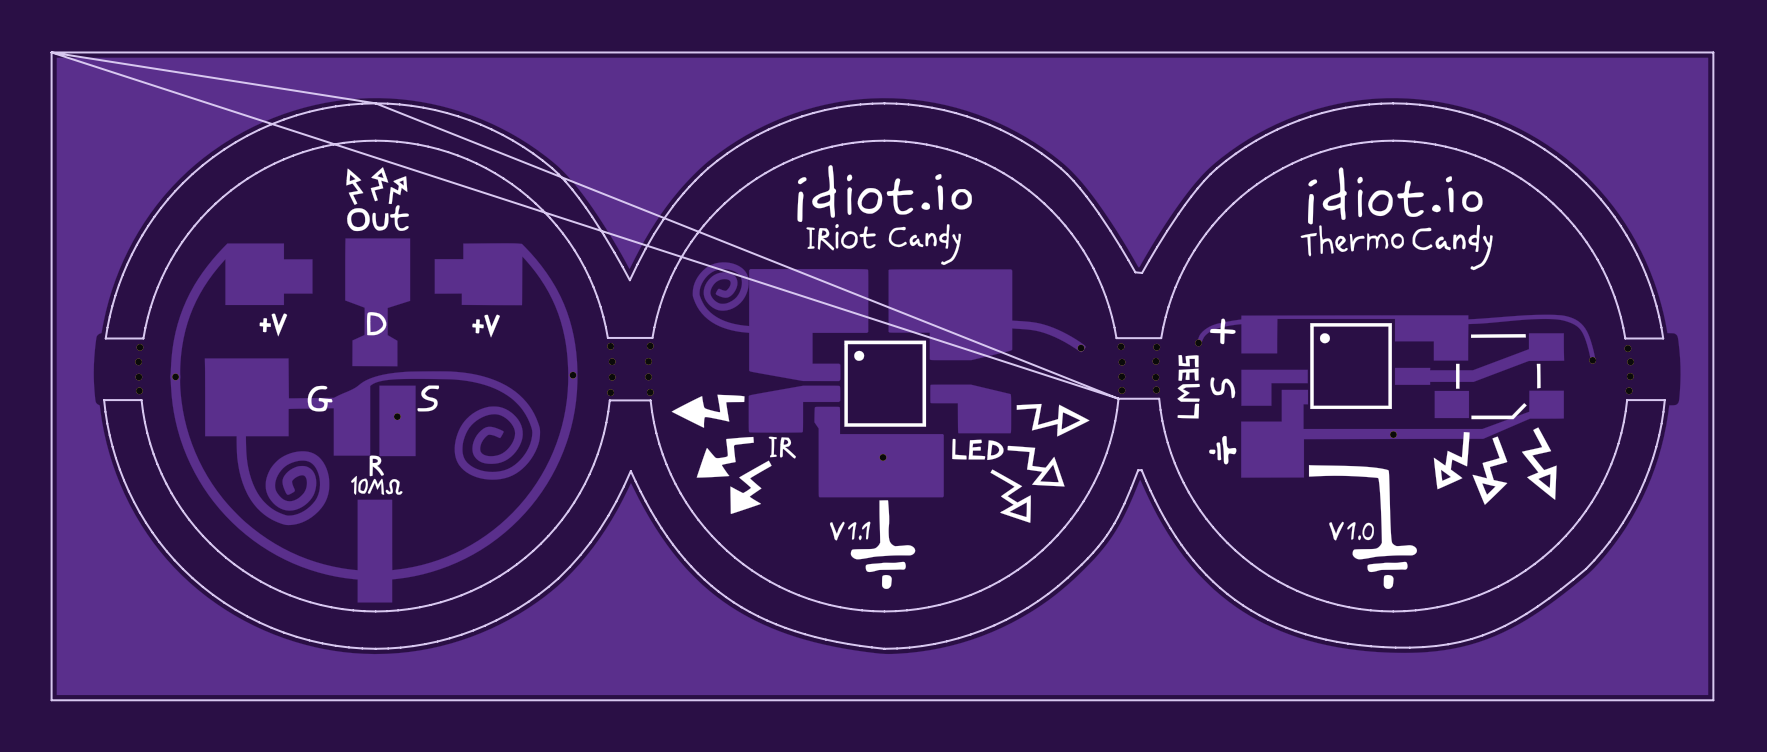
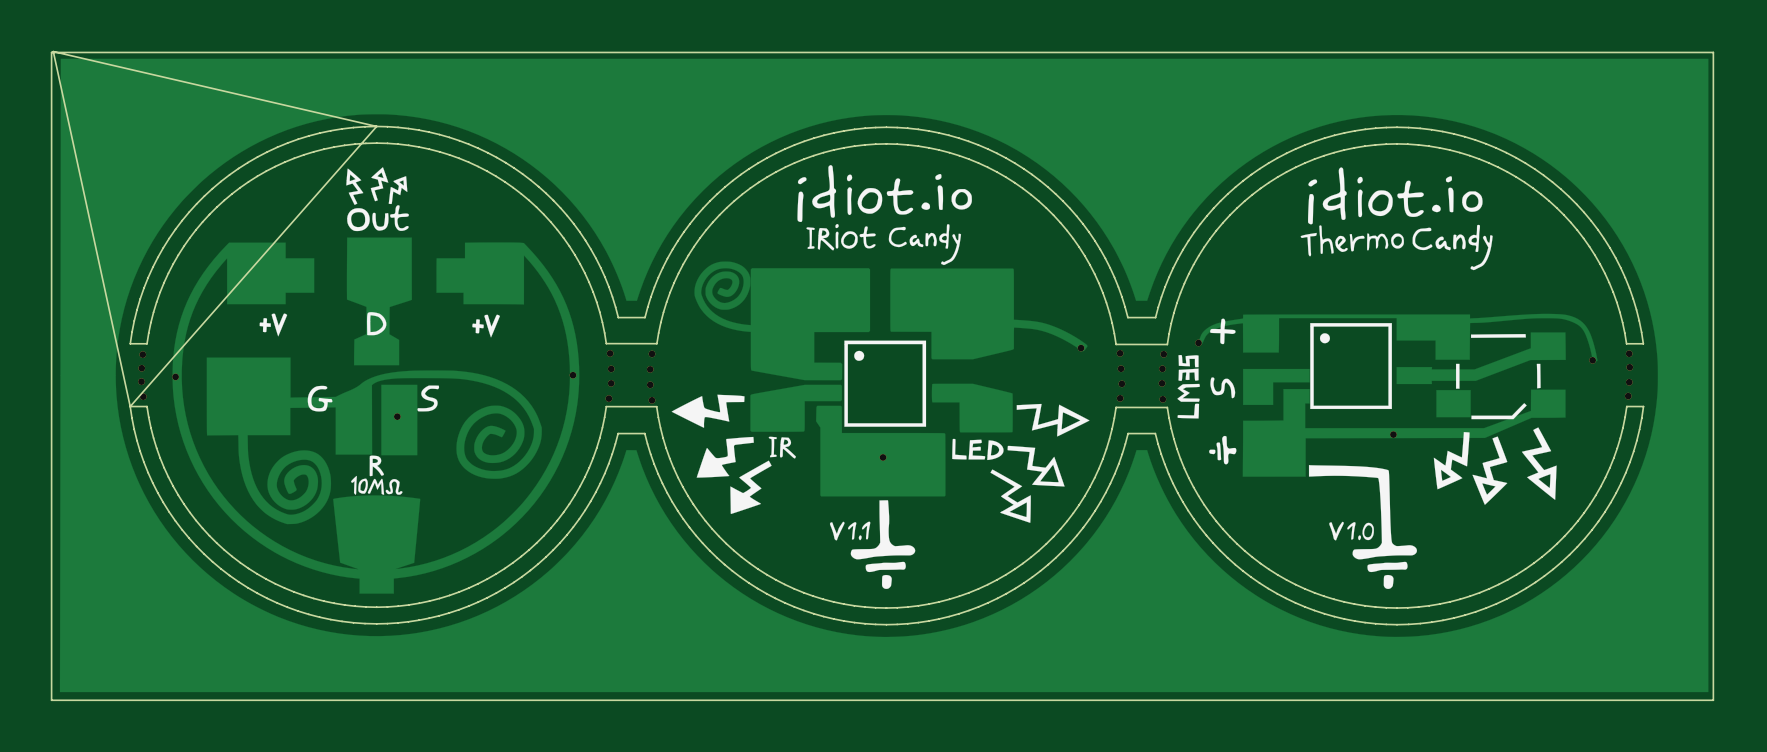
drawing shape: [56, 57, 1709, 696] -> [59, 58, 1709, 693]
board edge: (375, 103) (411, 105) (458, 116) (502, 134) (533, 153) (558, 174) (579, 198) (604, 235) (629, 280) (663, 220) (683, 193) (708, 168) (727, 153) (757, 134) (790, 120) (825, 110) (872, 103) (920, 105) (967, 116) (1011, 134) (1041, 153) (1073, 180) (1098, 213) (1135, 272) (1142, 272) (1178, 213) (1204, 180) (1235, 153) (1266, 134) (1310, 116) (1357, 105) (1406, 103) (1446, 108) (1485, 119) (1521, 135) (1555, 157) (1593, 191) (1614, 216) (1637, 254) (1653, 295) (1663, 338) (1625, 338) (1614, 297) (1592, 250) (1567, 218) (1529, 184) (1494, 163) (1465, 152) (1425, 142) (1393, 140) (1350, 144) (1310, 155) (1274, 173) (1240, 196) (1212, 225) (1189, 259) (1171, 297) (1161, 338) (1116, 338) (1105, 297) (1083, 250) (1058, 218) (1020, 184) (985, 163) (957, 152) (916, 142) (884, 140) (852, 142) (811, 152) (783, 163) (748, 184) (710, 217) (685, 250) (663, 296) (652, 337) (607, 337) (597, 296) (579, 259) (556, 225) (528, 196) (494, 173) (457, 155) (417, 144) (375, 140) (343, 142) (303, 152) (274, 163) (239, 184) (201, 218) (176, 250) (153, 297) (143, 338) (105, 338) (115, 295) (136, 244) (160, 208) (192, 174) (235, 142) (283, 119) (335, 106) (375, 103) -> (376, 126) (330, 130) (287, 143) (247, 162) (212, 188) (182, 220) (157, 257) (140, 298) (130, 343) (147, 343) (156, 302) (173, 263) (196, 229) (232, 193) (266, 171) (303, 154) (344, 145) (376, 143) (419, 147) (459, 158) (496, 176) (529, 200) (557, 229) (580, 263) (596, 302) (606, 343) (656, 343) (666, 302) (688, 255) (712, 222) (750, 188) (785, 167) (813, 155) (854, 146) (886, 143) (918, 146) (959, 155) (987, 167) (1022, 188) (1060, 222) (1084, 255) (1106, 302) (1116, 344) (1167, 344) (1176, 302) (1193, 264) (1216, 230) (1244, 201) (1277, 177) (1314, 159) (1354, 147) (1397, 143) (1429, 146) (1469, 155) (1507, 171) (1541, 194) (1577, 230) (1600, 264) (1616, 302) (1626, 343) (1643, 343) (1636, 309) (1620, 267) (1604, 238) (1576, 204) (1543, 175) (1515, 157) (1475, 140) (1442, 131) (1397, 127) (1344, 132) (1305, 145) (1259, 168) (1220, 201) (1194, 232) (1168, 277) (1155, 317) (1127, 317) (1110, 267) (1083, 224) (1047, 187) (1006, 158) (958, 138) (918, 129) (875, 127) (833, 132) (804, 141) (775, 153) (749, 168) (724, 187) (696, 216) (672, 249) (654, 287) (645, 317) (618, 317) (605, 277) (585, 240) (560, 207) (530, 180) (496, 157) (459, 140) (419, 130) (376, 126)
board edge: (375, 103) (51, 52) (1118, 398) -> none
board edge: (375, 103) (1118, 398) -> none
board edge: none -> (376, 126) (53, 51) (130, 406)
board edge: none -> (376, 126) (130, 406)
part: (610, 346) -> none
part: (650, 346) -> none
part: (1121, 346) -> none
part: (139, 347) -> none
part: (1156, 347) -> none
part: (1627, 348) -> none
part: none -> (610, 353)
part: none -> (652, 353)
part: none -> (1120, 353)
part: none -> (1629, 353)
part: none -> (142, 354)
part: none -> (1163, 354)
part: (138, 361) -> none
part: (612, 361) -> none
part: (648, 361) -> none
part: (1155, 361) -> none
part: (1630, 361) -> none
part: (1122, 362) -> none
part: none -> (1629, 367)
part: none -> (141, 368)
part: none -> (611, 368)
part: none -> (1121, 368)
part: none -> (1162, 368)
part: none -> (650, 369)
part: (648, 376) -> none
part: (1121, 376) -> none
part: (1630, 376) -> none
part: (138, 377) -> none
part: (612, 377) -> none
part: (1155, 377) -> none
part: none -> (141, 381)
part: none -> (1629, 382)
part: none -> (611, 383)
part: none -> (1121, 383)
part: none -> (1162, 383)
part: none -> (650, 384)
part: (1156, 389) -> none
part: (139, 390) -> none
part: (1121, 390) -> none
part: (1629, 390) -> none
part: (610, 392) -> none
part: (650, 392) -> none
part: none -> (143, 396)
part: none -> (1628, 396)
part: none -> (608, 398)
board edge: (1118, 398) (1159, 398) (1167, 442) (1174, 463) (1188, 492) (1213, 527) (1251, 563) (1287, 586) (1317, 598) (1359, 609) (1393, 611) (1426, 609) (1468, 598) (1498, 586) (1534, 564) (1572, 527) (1597, 493) (1618, 443) (1627, 400) (1664, 400) (1656, 446) (1640, 491) (1616, 532) (1594, 560) (1561, 589) (1515, 620) (1482, 635) (1448, 644) (1395, 647) (1347, 643) (1305, 634) (1259, 615) (1227, 594) (1193, 560) (1165, 519) (1141, 470) (1138, 470) (1114, 523) (1093, 552) (1058, 586) (1016, 614) (970, 634) (922, 646) (884, 648) (825, 639) (794, 631) (766, 620) (741, 607) (711, 585) (691, 566) (667, 536) (650, 510) (630, 471) (608, 515) (590, 542) (558, 578) (528, 601) (496, 620) (449, 638) (413, 646) (375, 648) (335, 645) (283, 632) (235, 609) (192, 578) (159, 542) (134, 502) (119, 469) (112, 446) (104, 400) (141, 400) (150, 443) (171, 493) (195, 527) (234, 564) (270, 586) (300, 599) (342, 609) (375, 611) (409, 609) (451, 599) (480, 586) (516, 564) (555, 528) (579, 493) (601, 443) (609, 400) (650, 400) (659, 443) (675, 483) (698, 519) (727, 550) (760, 576) (798, 595) (840, 607) (884, 611) (928, 607) (970, 595) (1008, 575) (1042, 550) (1071, 518) (1094, 482) (1110, 442) (1118, 398) -> (130, 406) (136, 440) (148, 472) (163, 502) (189, 538) (220, 568) (247, 587) (277, 603) (308, 614) (353, 622) (376, 623) (408, 621) (449, 612) (496, 592) (538, 564) (573, 527) (600, 483) (618, 433) (644, 433) (658, 473) (677, 510) (702, 543) (732, 571) (766, 593) (803, 610) (844, 621) (886, 624) (928, 621) (969, 610) (1006, 593) (1040, 571) (1070, 543) (1095, 510) (1114, 473) (1128, 433) (1155, 433) (1173, 483) (1200, 527) (1235, 564) (1277, 593) (1324, 613) (1365, 622) (1397, 624) (1420, 623) (1465, 615) (1496, 603) (1526, 588) (1553, 569) (1584, 538) (1610, 502) (1625, 472) (1636, 440) (1643, 406) (1626, 406) (1620, 438) (1605, 477) (1590, 504) (1564, 536) (1541, 557) (1516, 574) (1489, 588) (1460, 599) (1418, 607) (1375, 607) (1334, 599) (1286, 579) (1260, 563) (1237, 543) (1204, 504) (1180, 458) (1167, 407) (1116, 407) (1106, 449) (1089, 487) (1067, 521) (1038, 550) (1005, 574) (969, 592) (928, 604) (886, 608) (843, 604) (803, 592) (766, 574) (733, 550) (705, 520) (682, 486) (666, 448) (656, 406) (606, 406) (593, 458) (569, 504) (536, 543) (513, 562) (487, 579) (439, 598) (398, 606) (355, 606) (313, 598) (284, 588) (257, 573) (232, 556) (209, 535) (183, 503) (168, 477) (153, 438) (147, 406) (130, 406)
part: none -> (1120, 398)
part: none -> (1162, 399)
part: none -> (652, 400)

